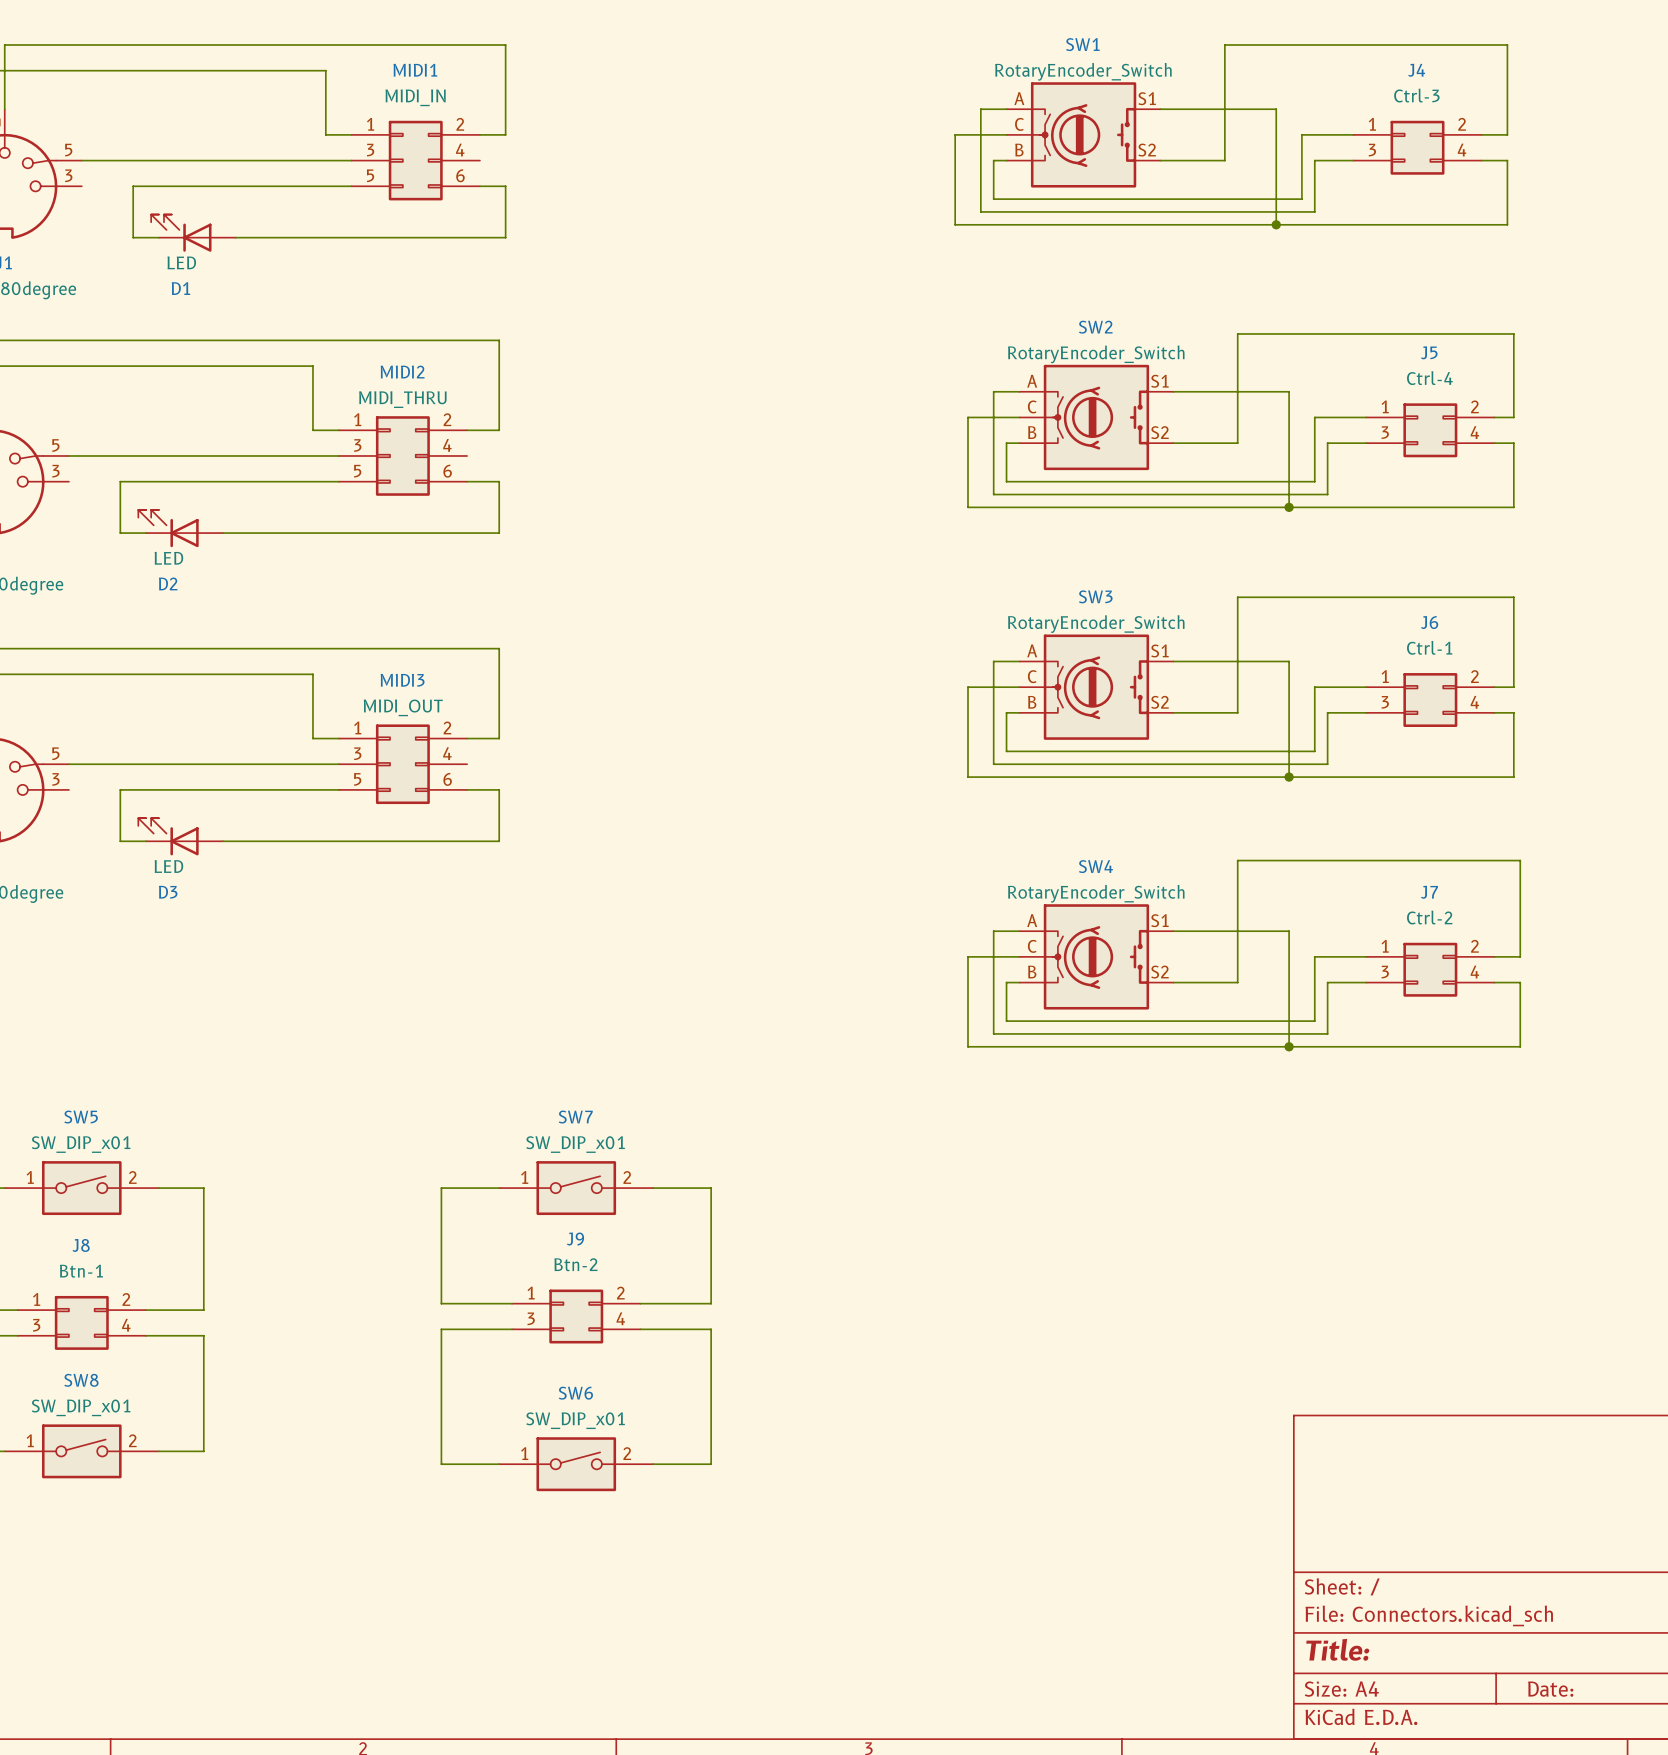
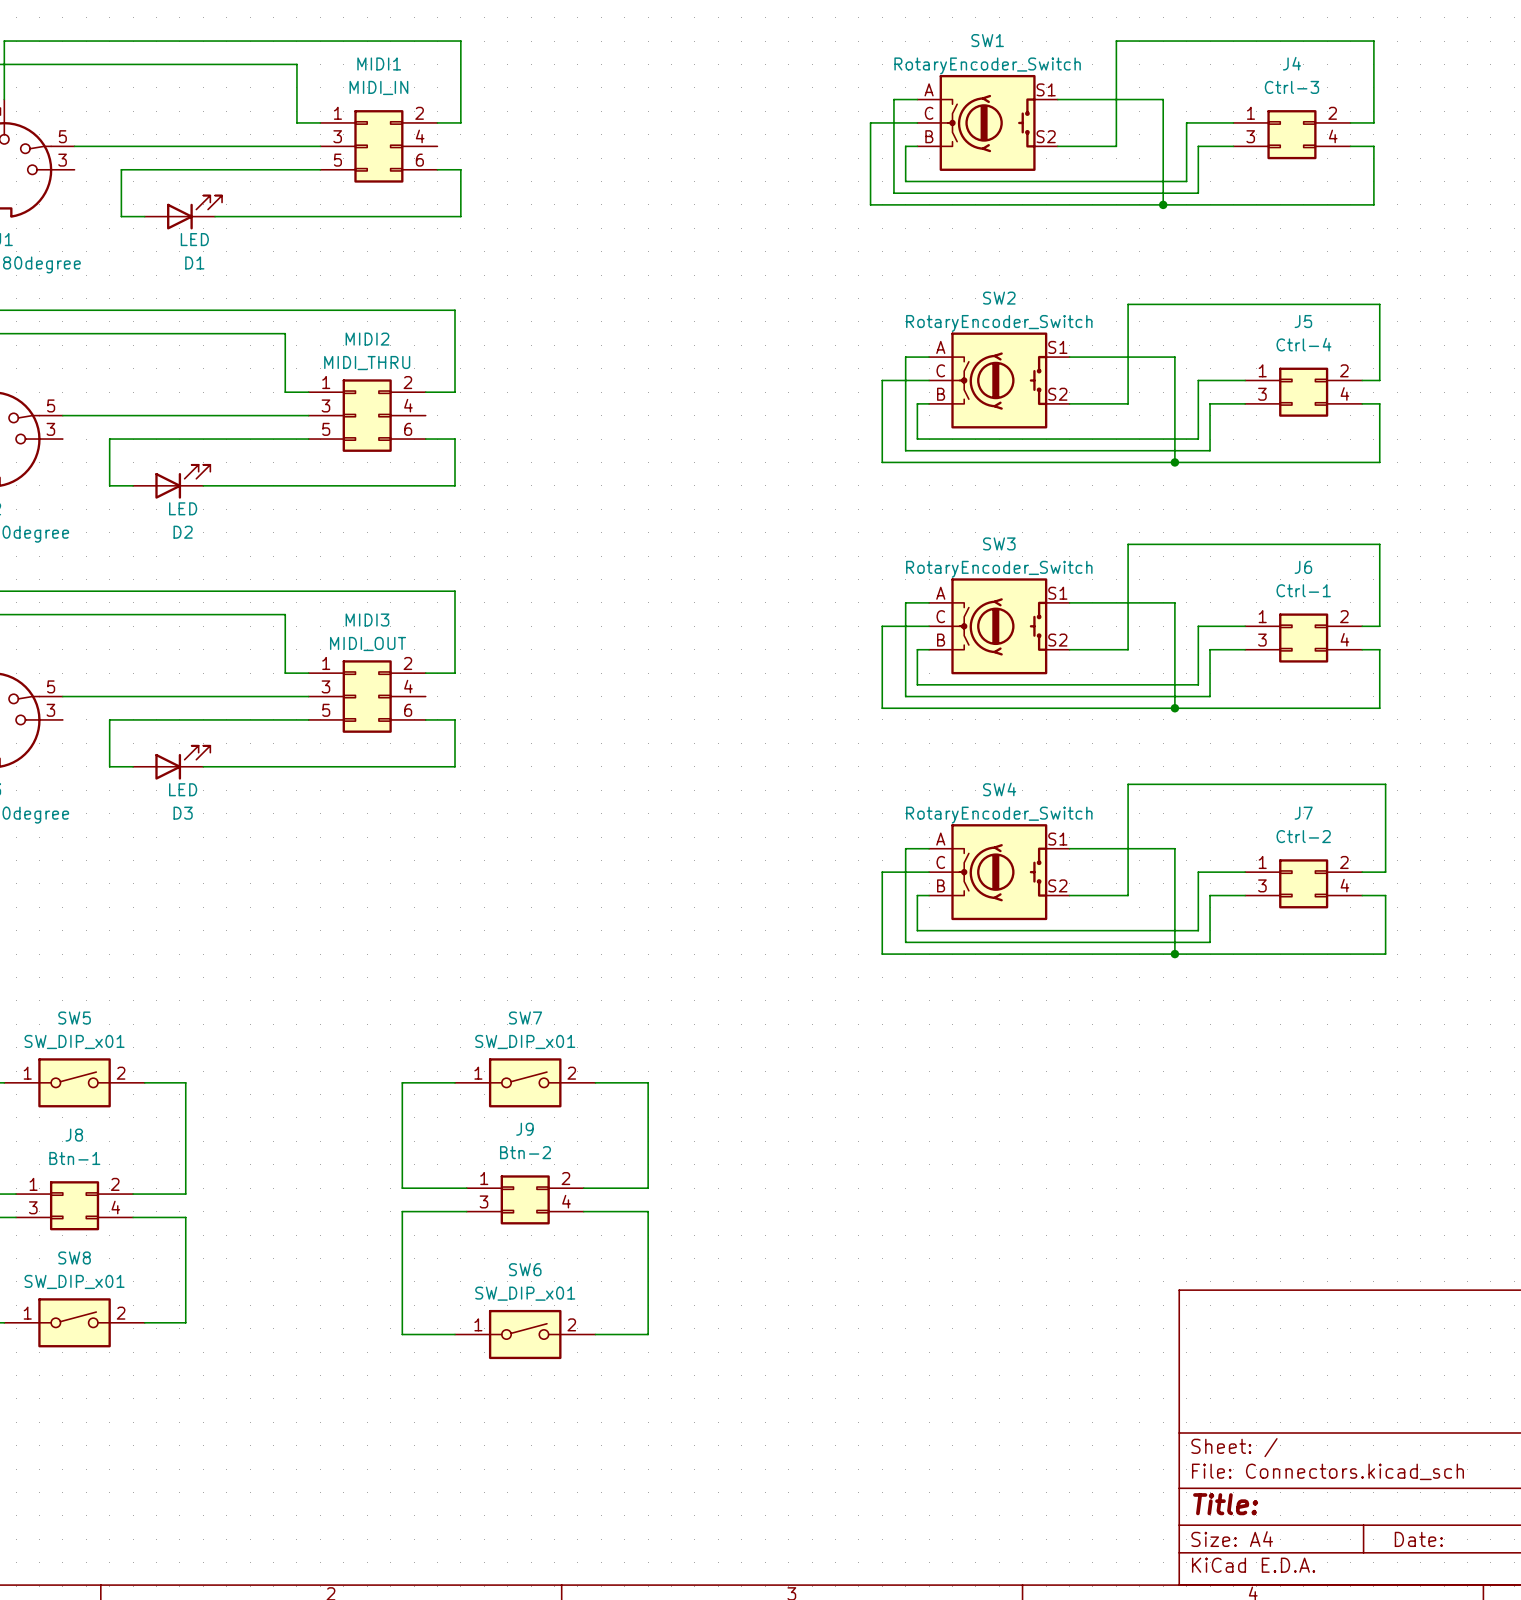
D1 flip: as is (181, 233) -> left-right (194, 212)
D2 flip: as is (168, 528) -> left-right (182, 481)
D3 flip: as is (168, 836) -> left-right (182, 762)

